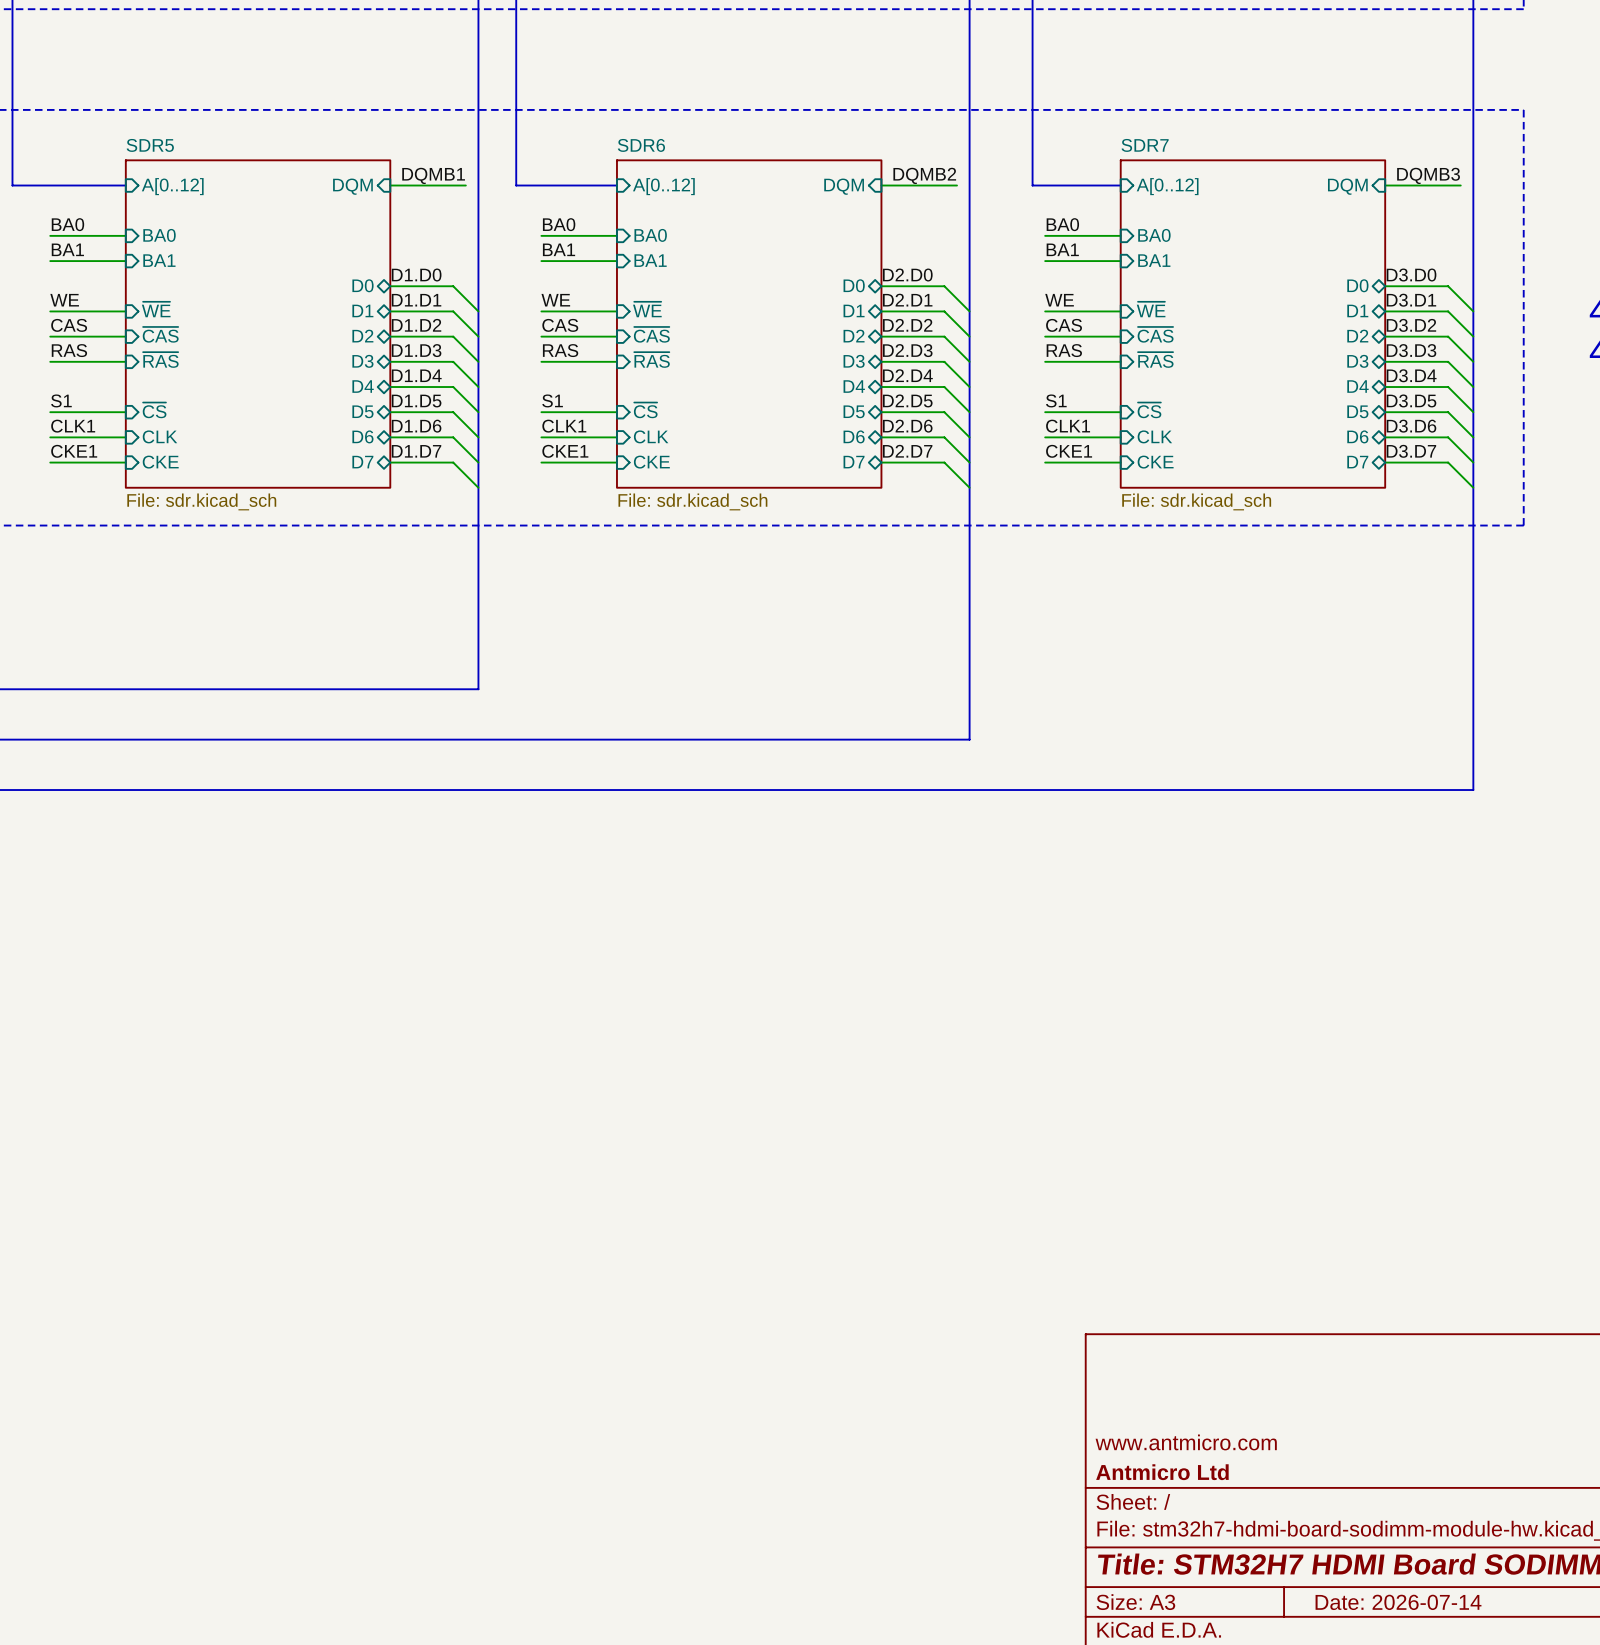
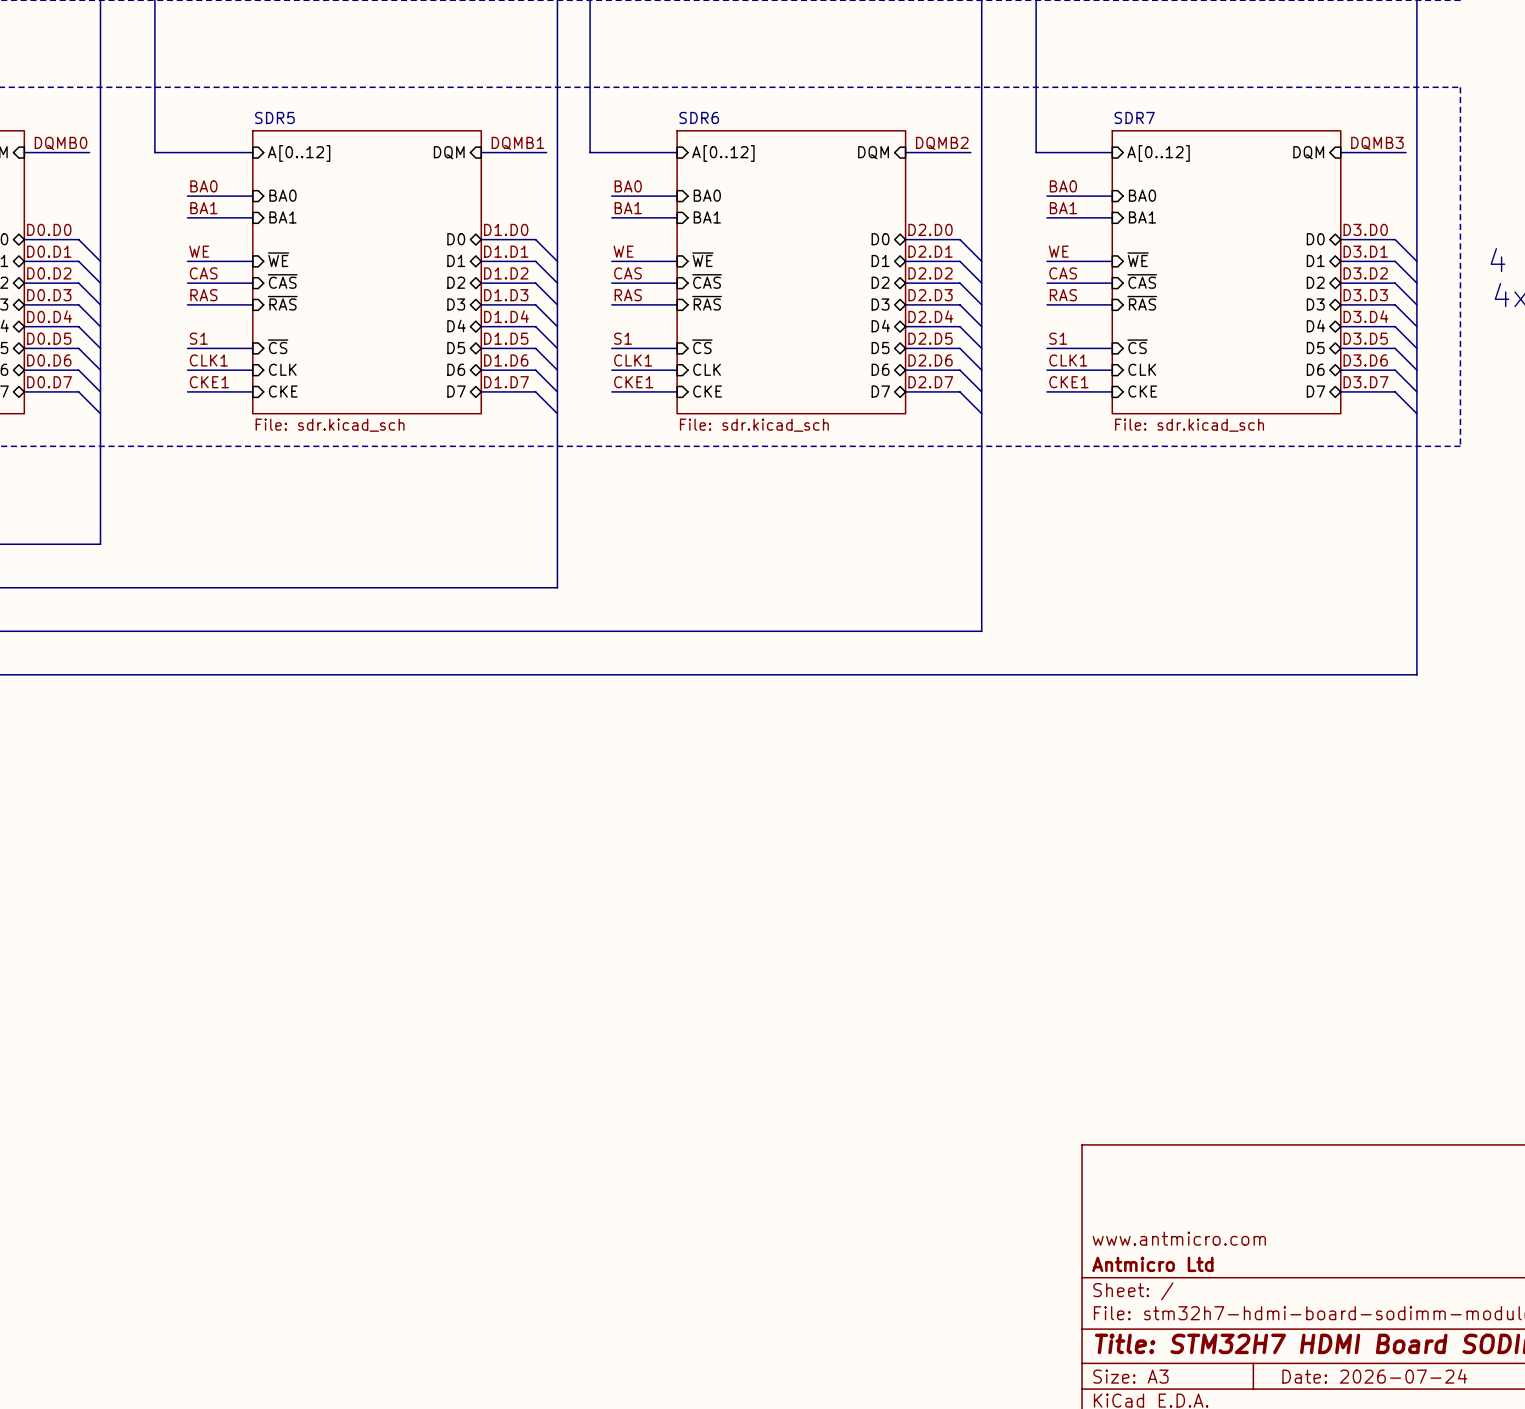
title block: Date: 2026-07-14 (1398, 1602) -> Date: 2026-07-24 (1374, 1376)

